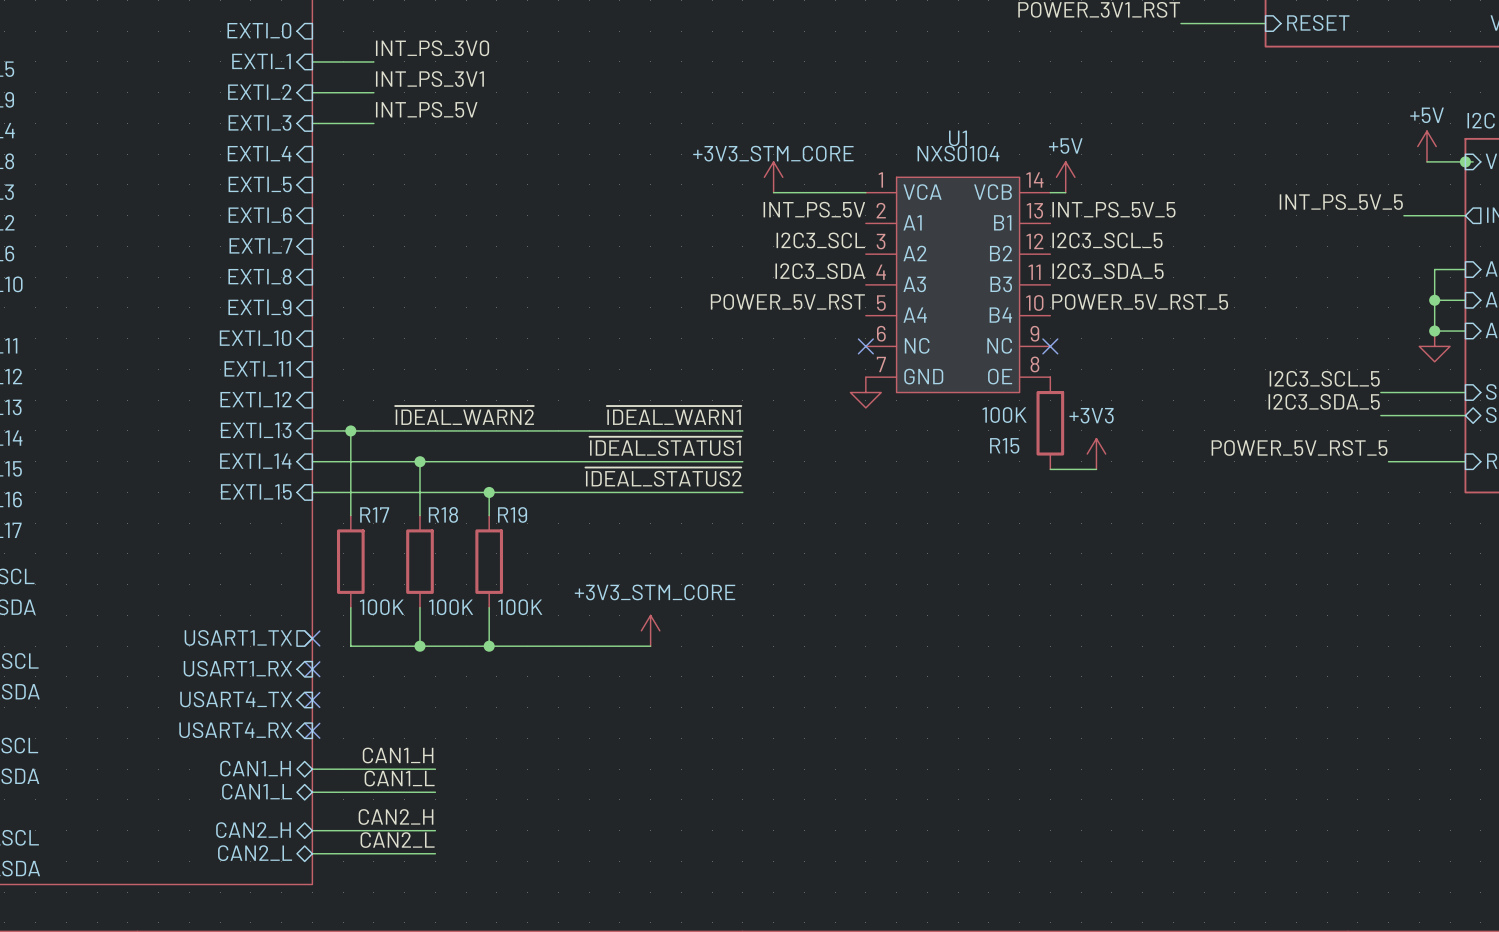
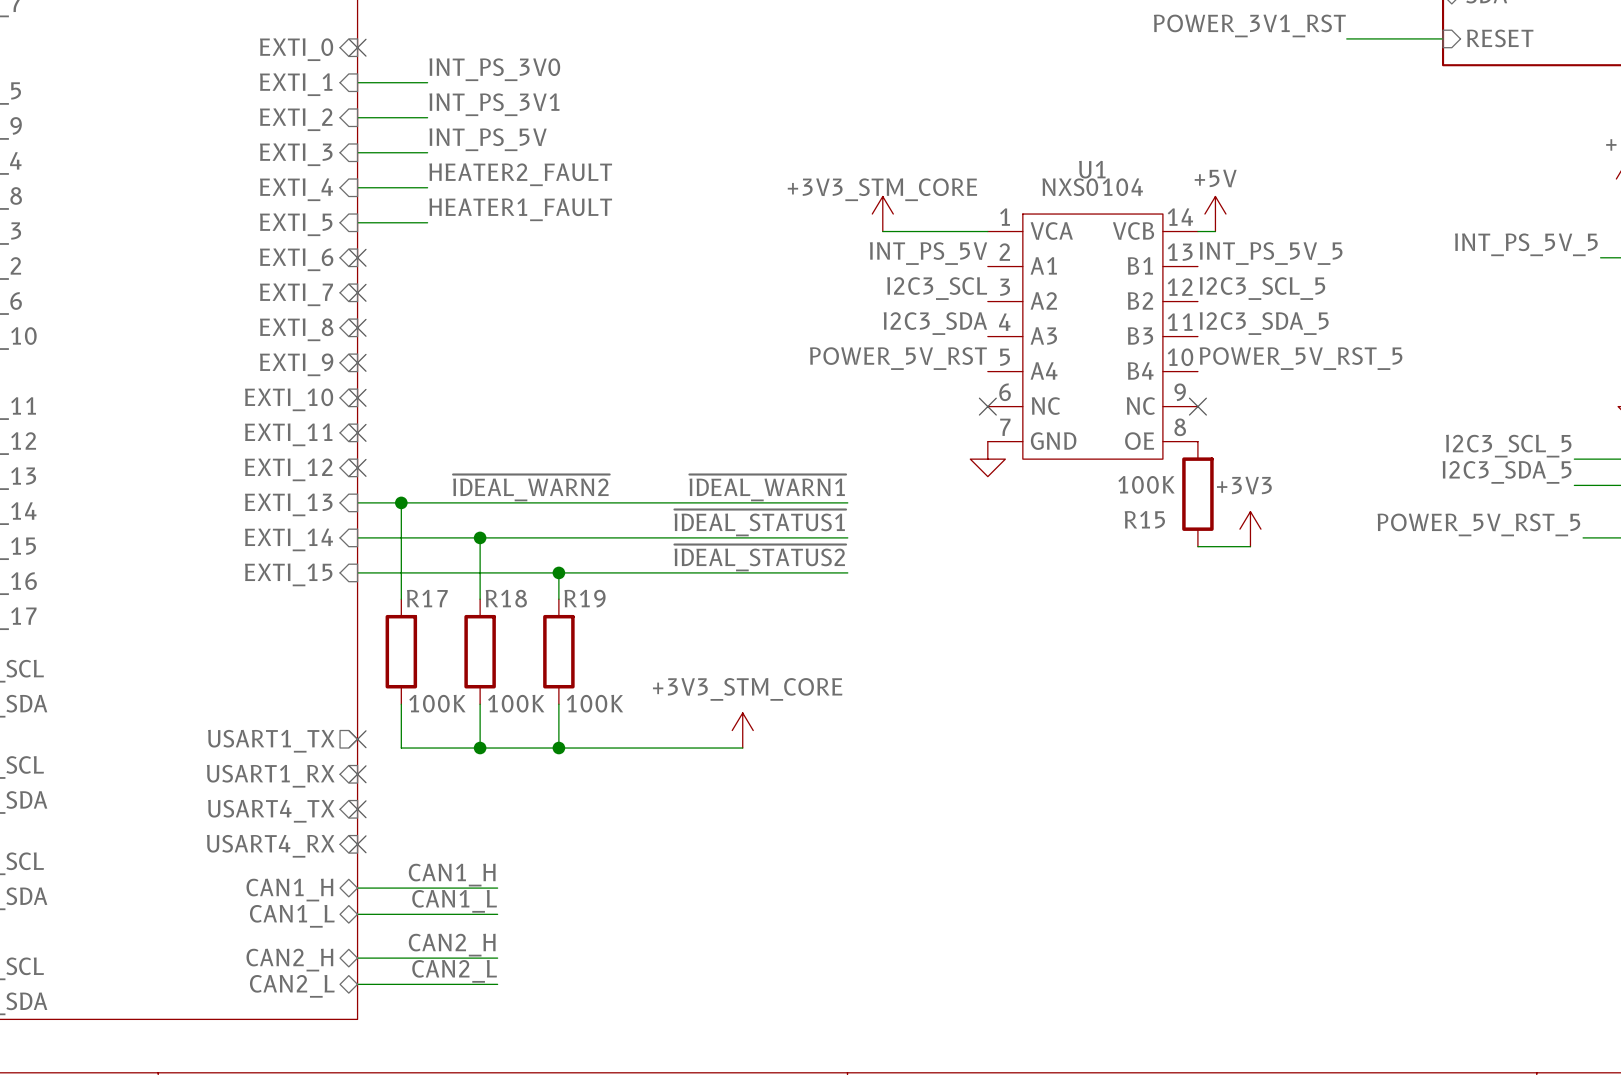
no-connect mark: none -> (357, 47)
label: none -> HEATER2_FAULT (520, 174)
wire: none -> (357, 187) (427, 187)
label: none -> HEATER1_FAULT (520, 209)
wire: none -> (357, 222) (427, 222)
no-connect mark: none -> (357, 257)
no-connect mark: none -> (357, 292)
no-connect mark: none -> (357, 327)
no-connect mark: none -> (357, 362)
no-connect mark: none -> (357, 397)
no-connect mark: none -> (357, 432)
no-connect mark: none -> (357, 467)

